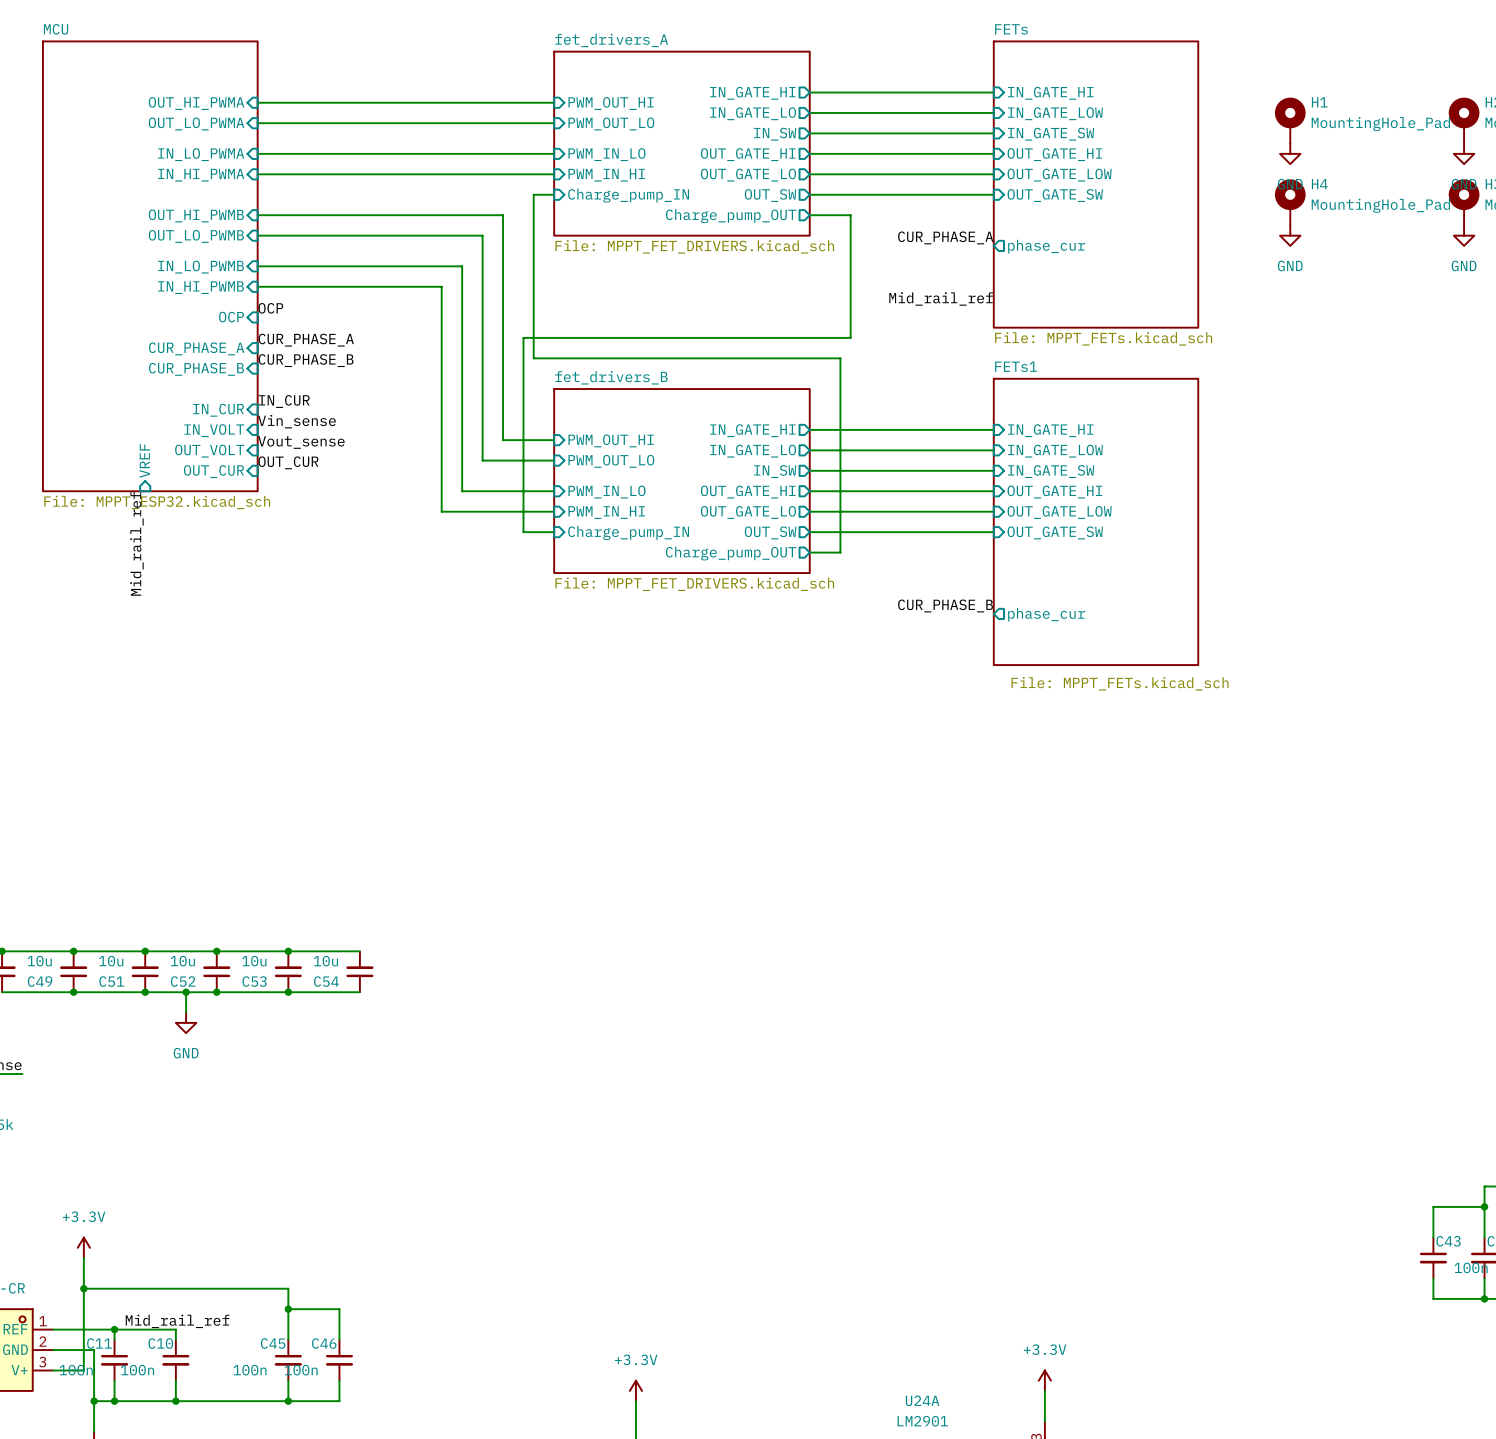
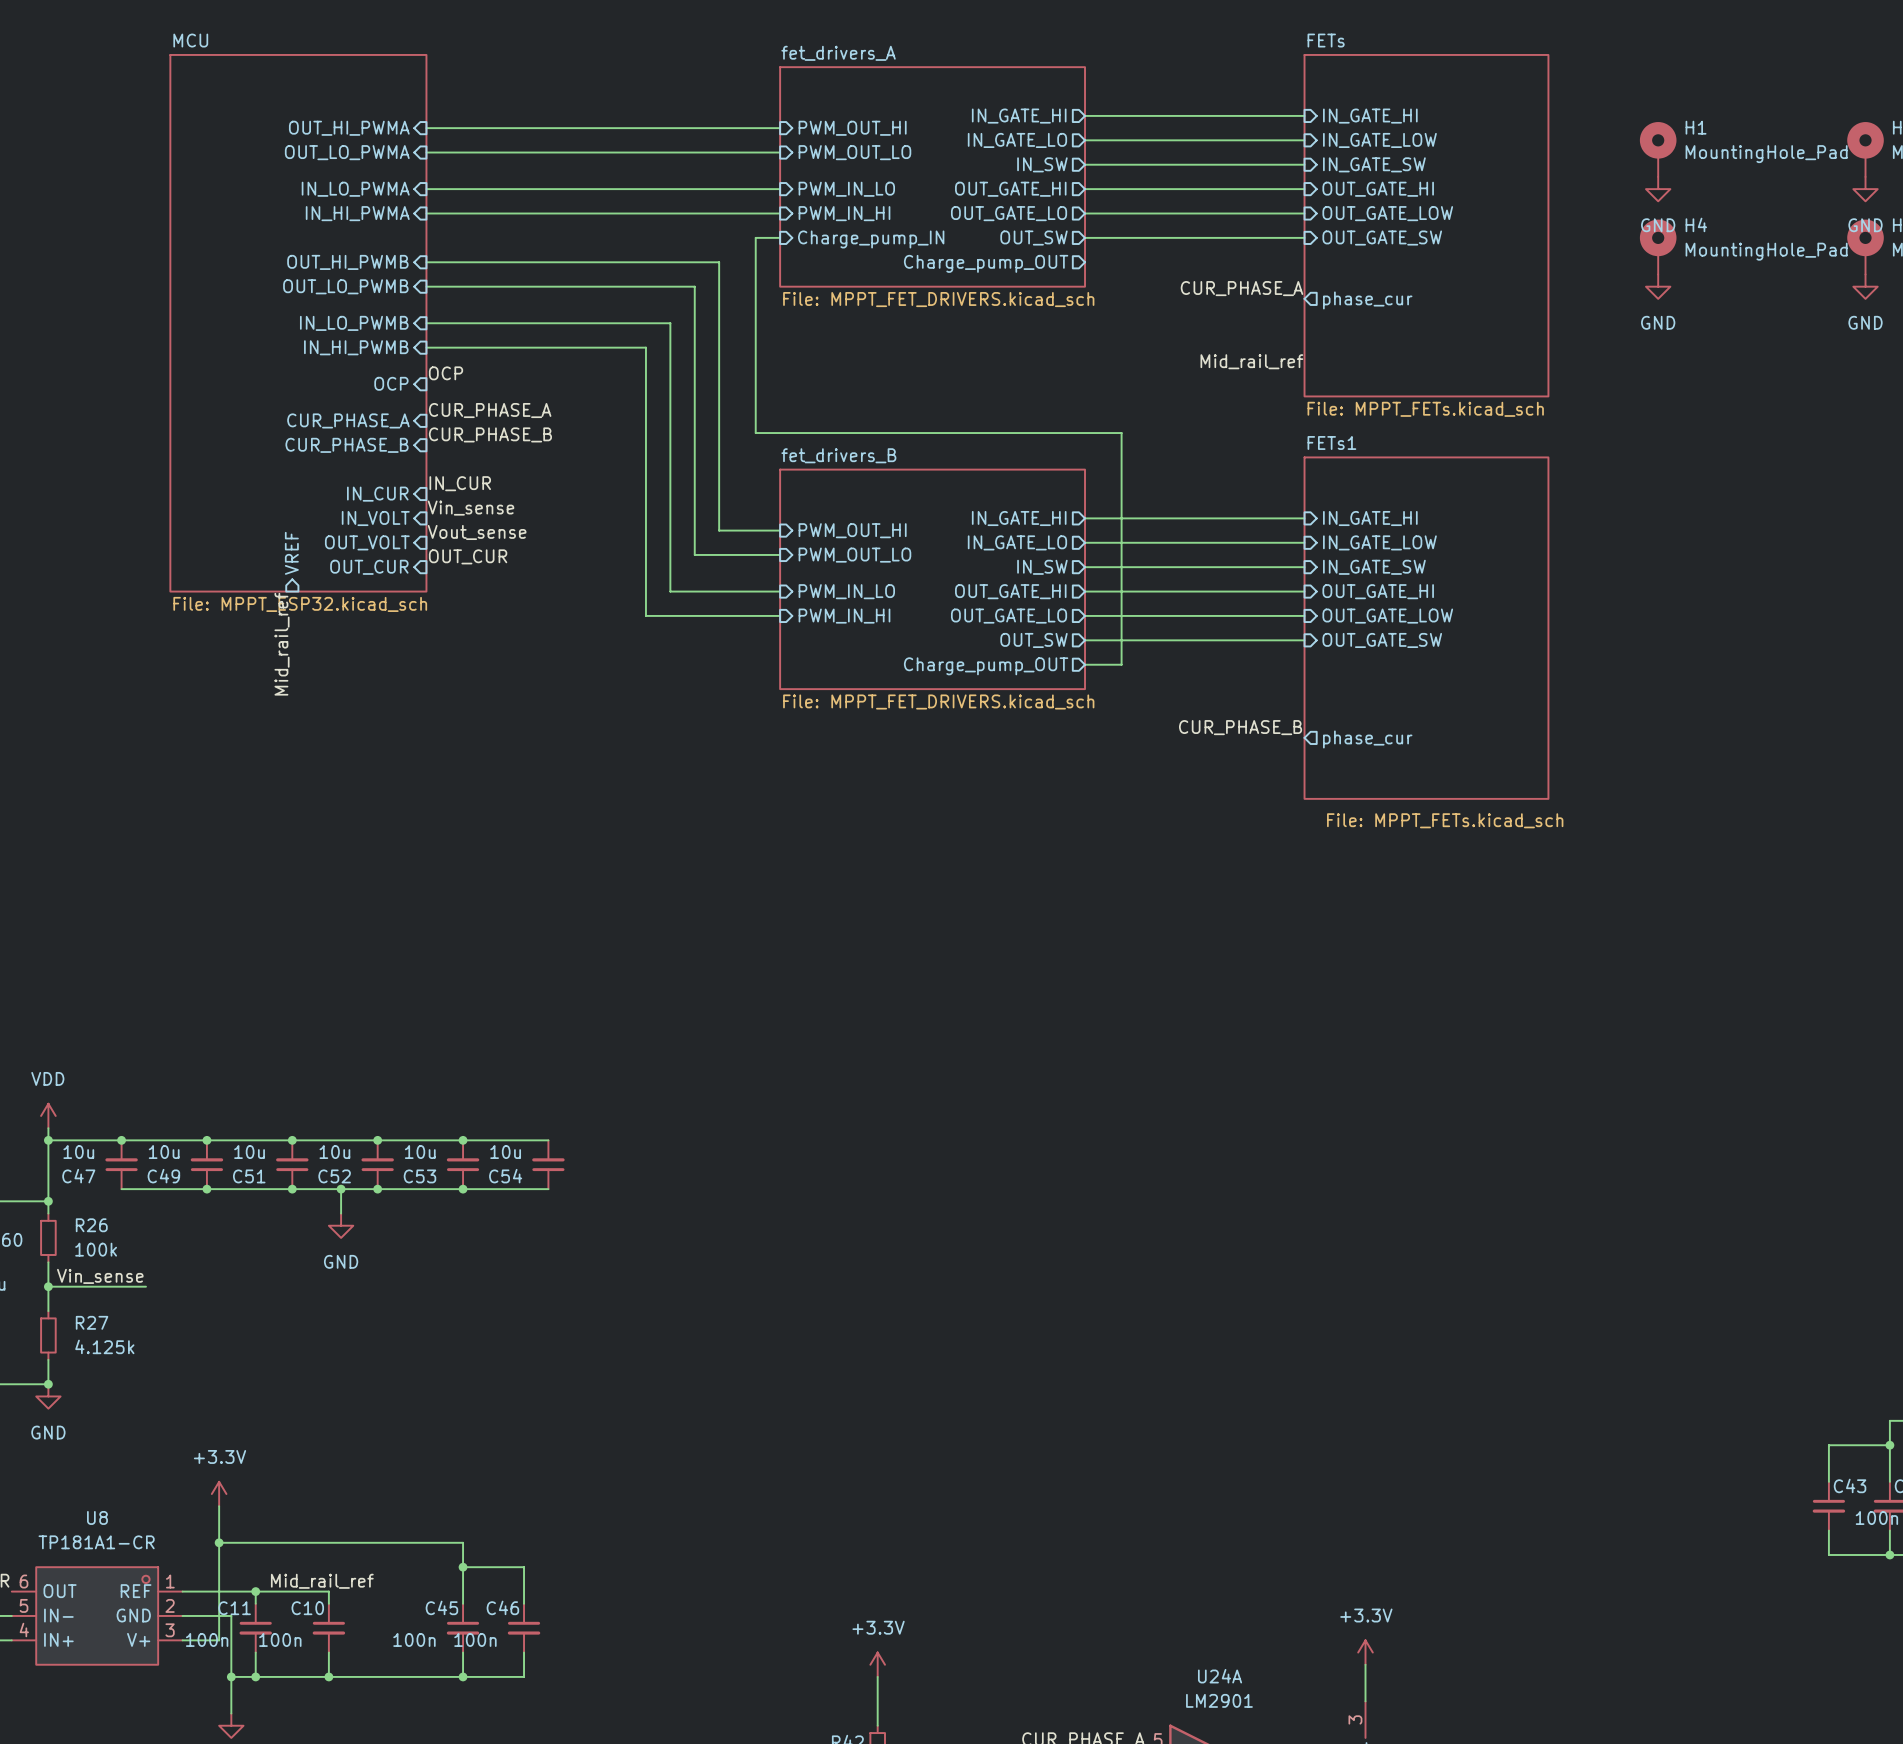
wire: (809, 215) (850, 215) (850, 337) (523, 337) (523, 532) (554, 532) -> none
sheet pin: Charge_pump_IN (628, 533) -> none

